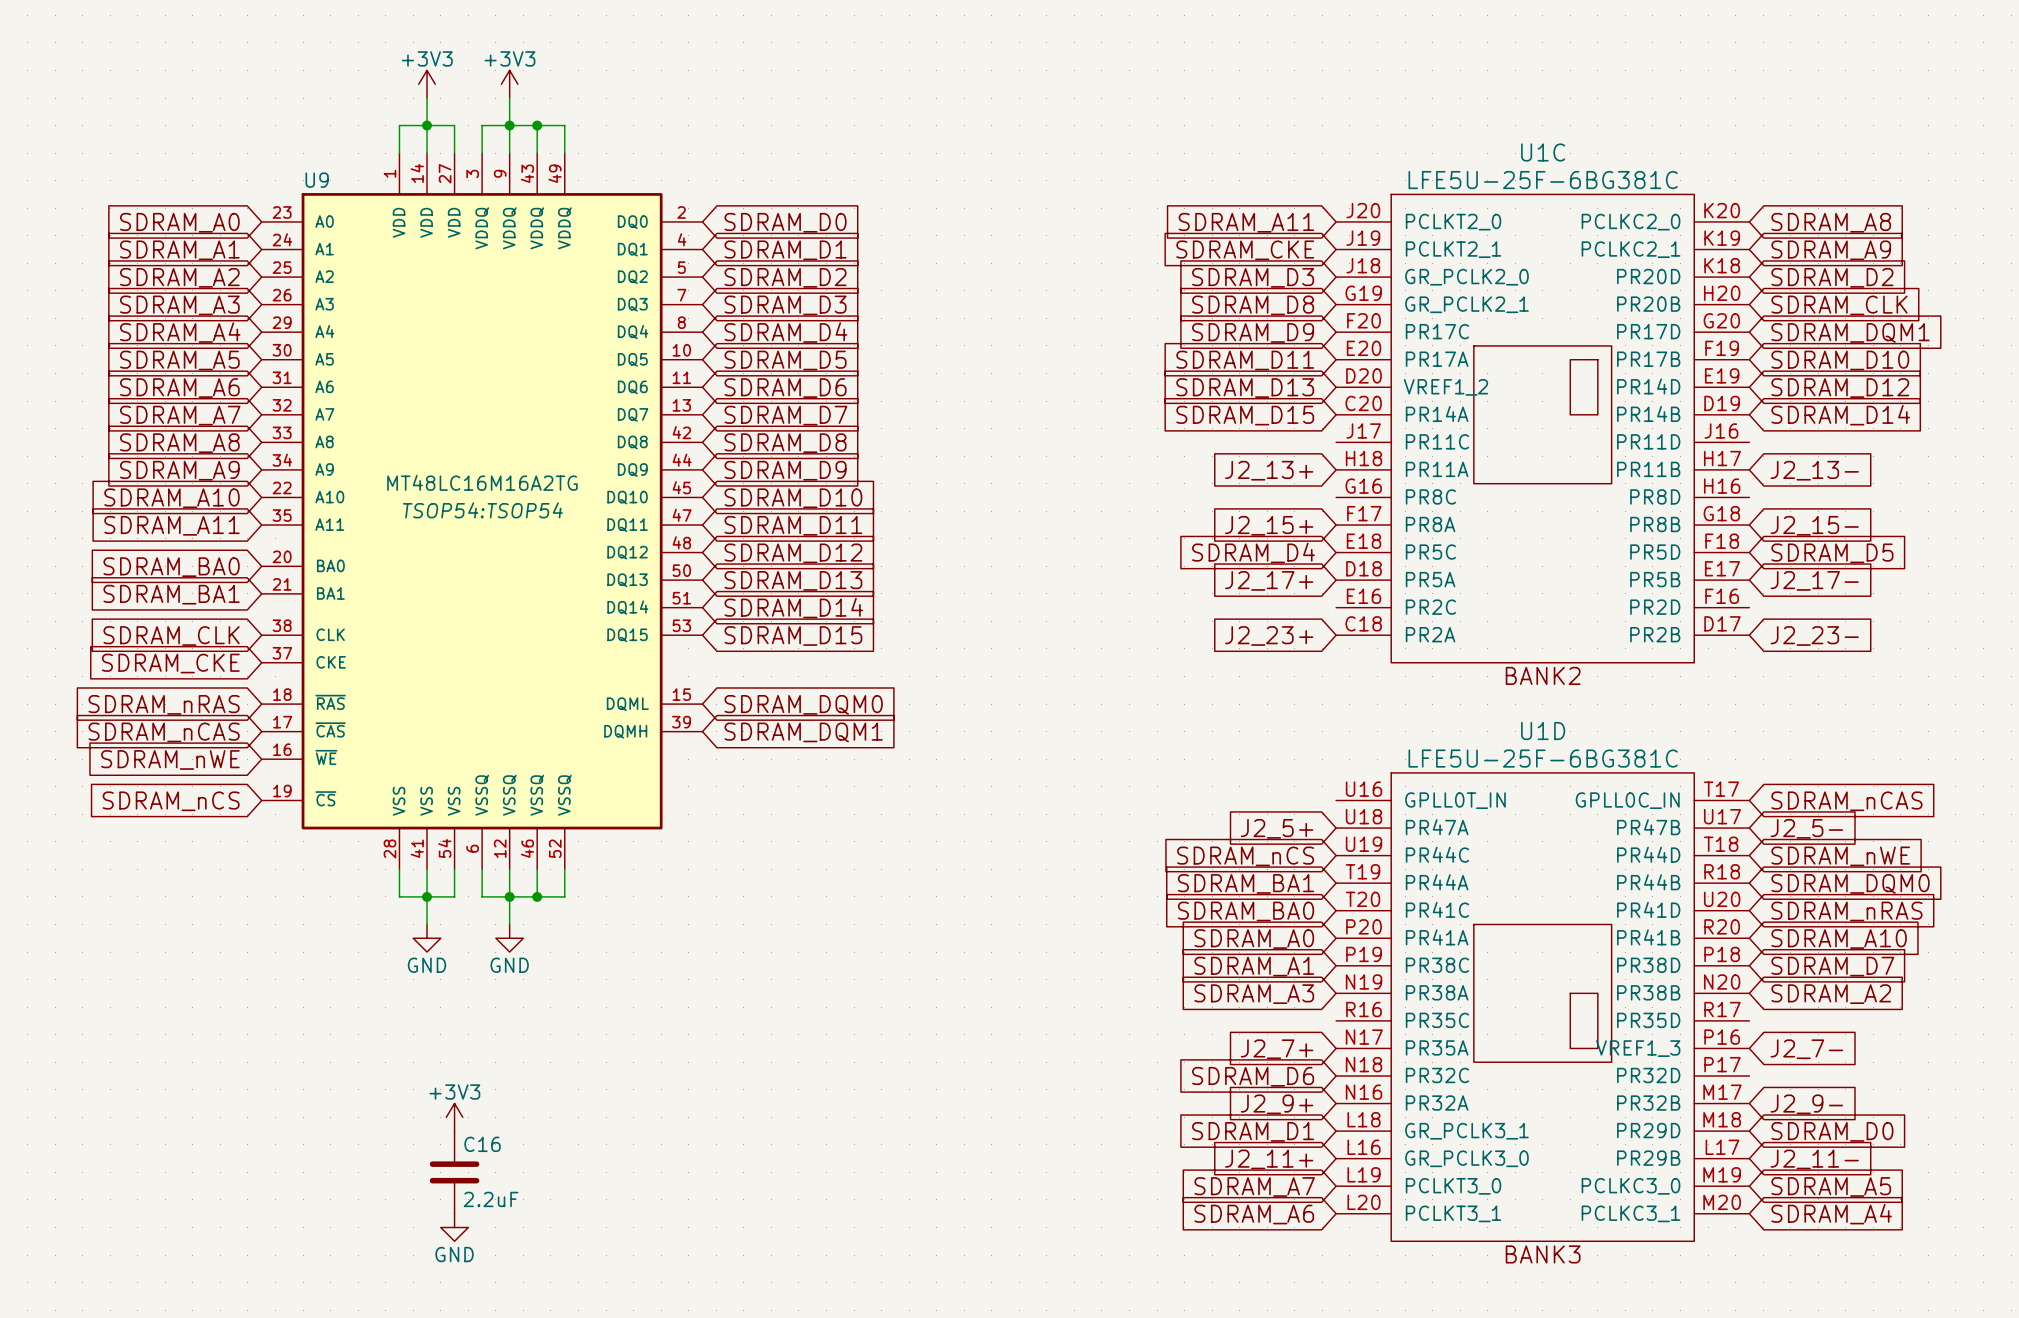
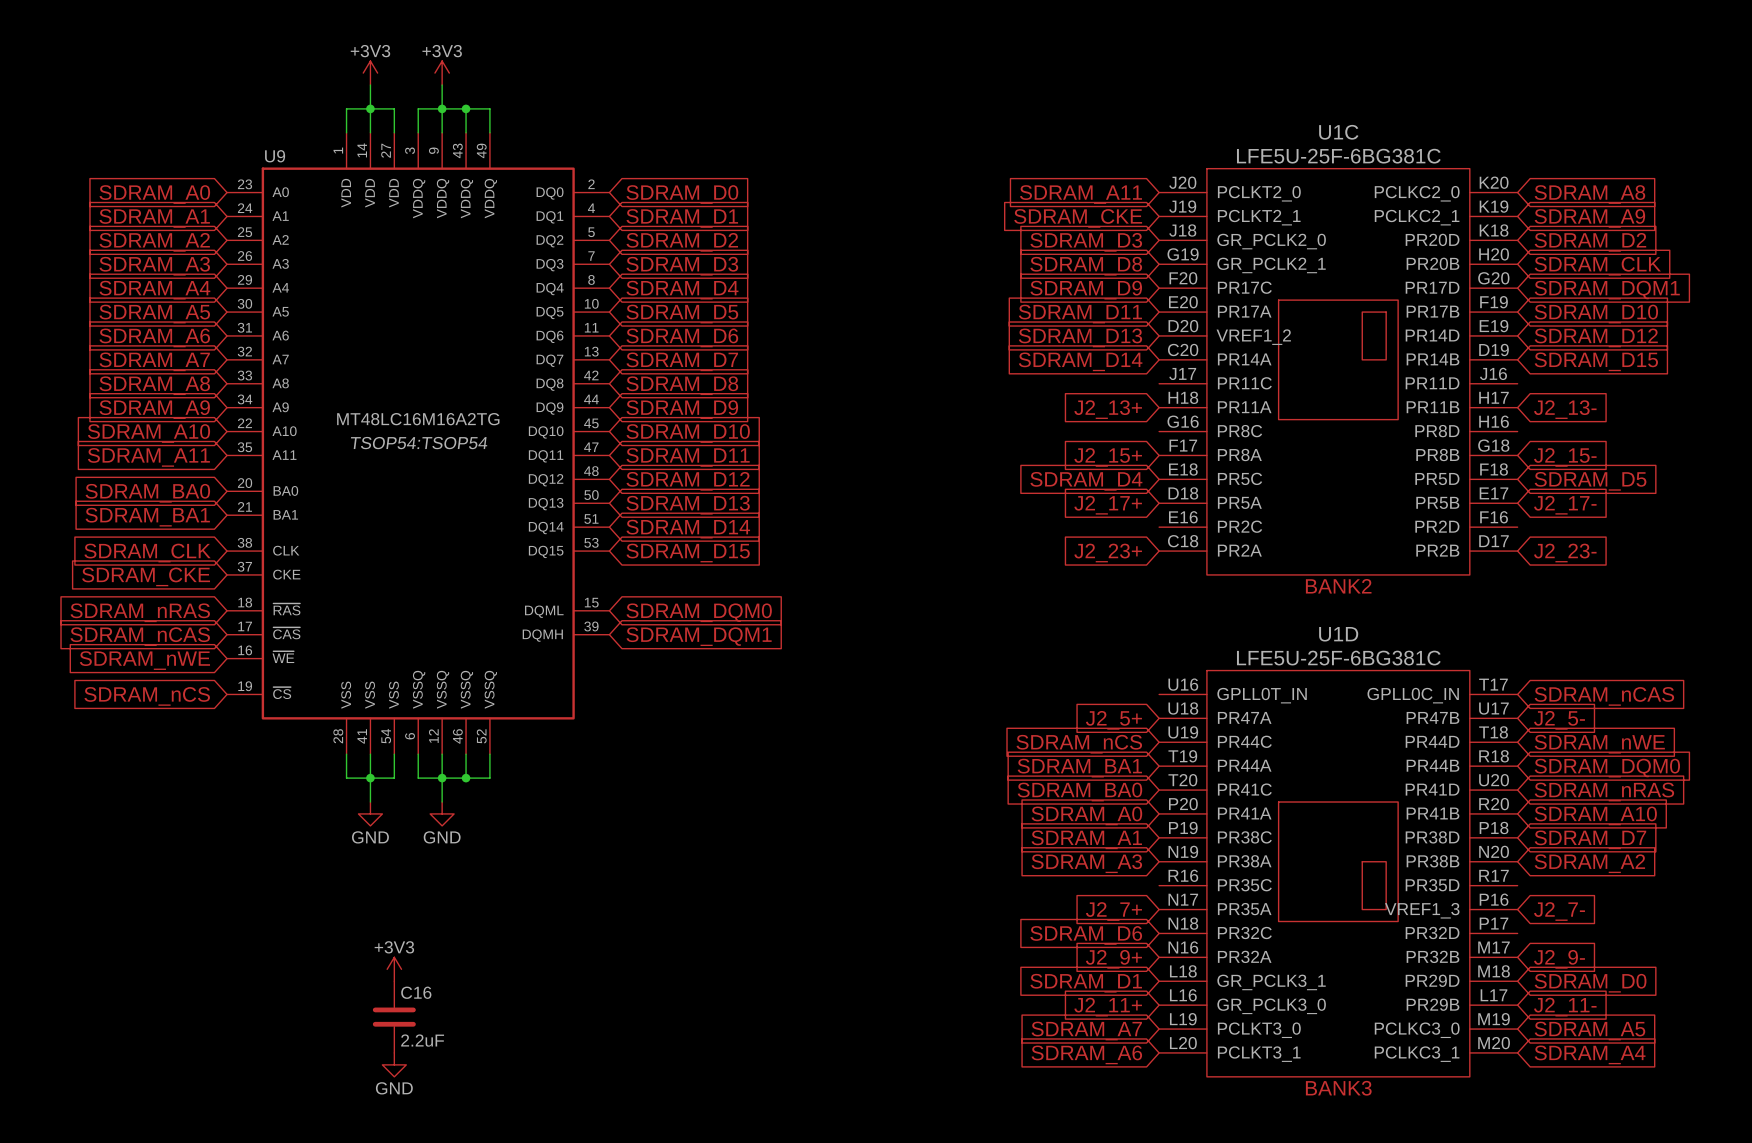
global label: SDRAM_D15 (1245, 415) -> SDRAM_D14 (1080, 361)
global label: SDRAM_D14 (1840, 415) -> SDRAM_D15 (1596, 361)

